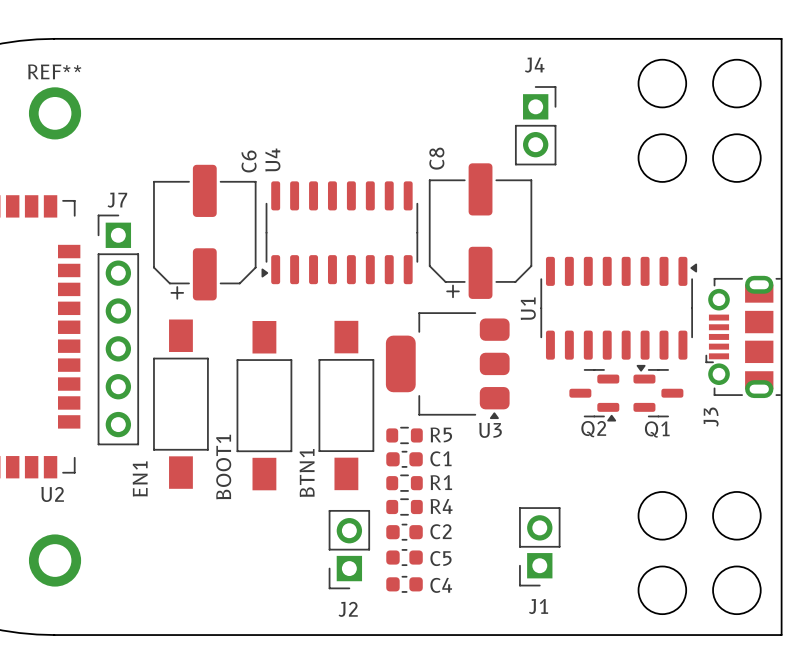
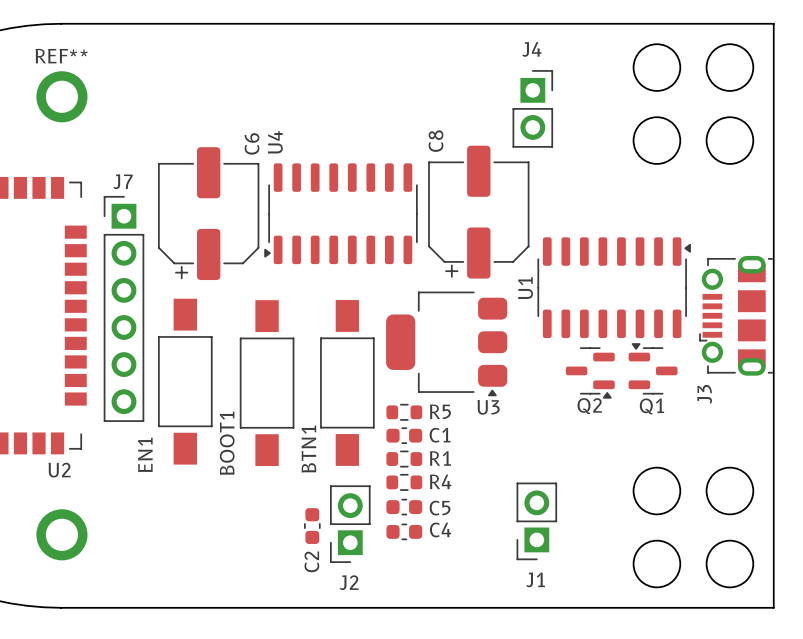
C2 name: C2 (441, 531) -> C5 (440, 508)
C2: none -> (312, 526)
C5 name: C5 (440, 558) -> C4 (440, 529)
C4: (404, 584) -> none

